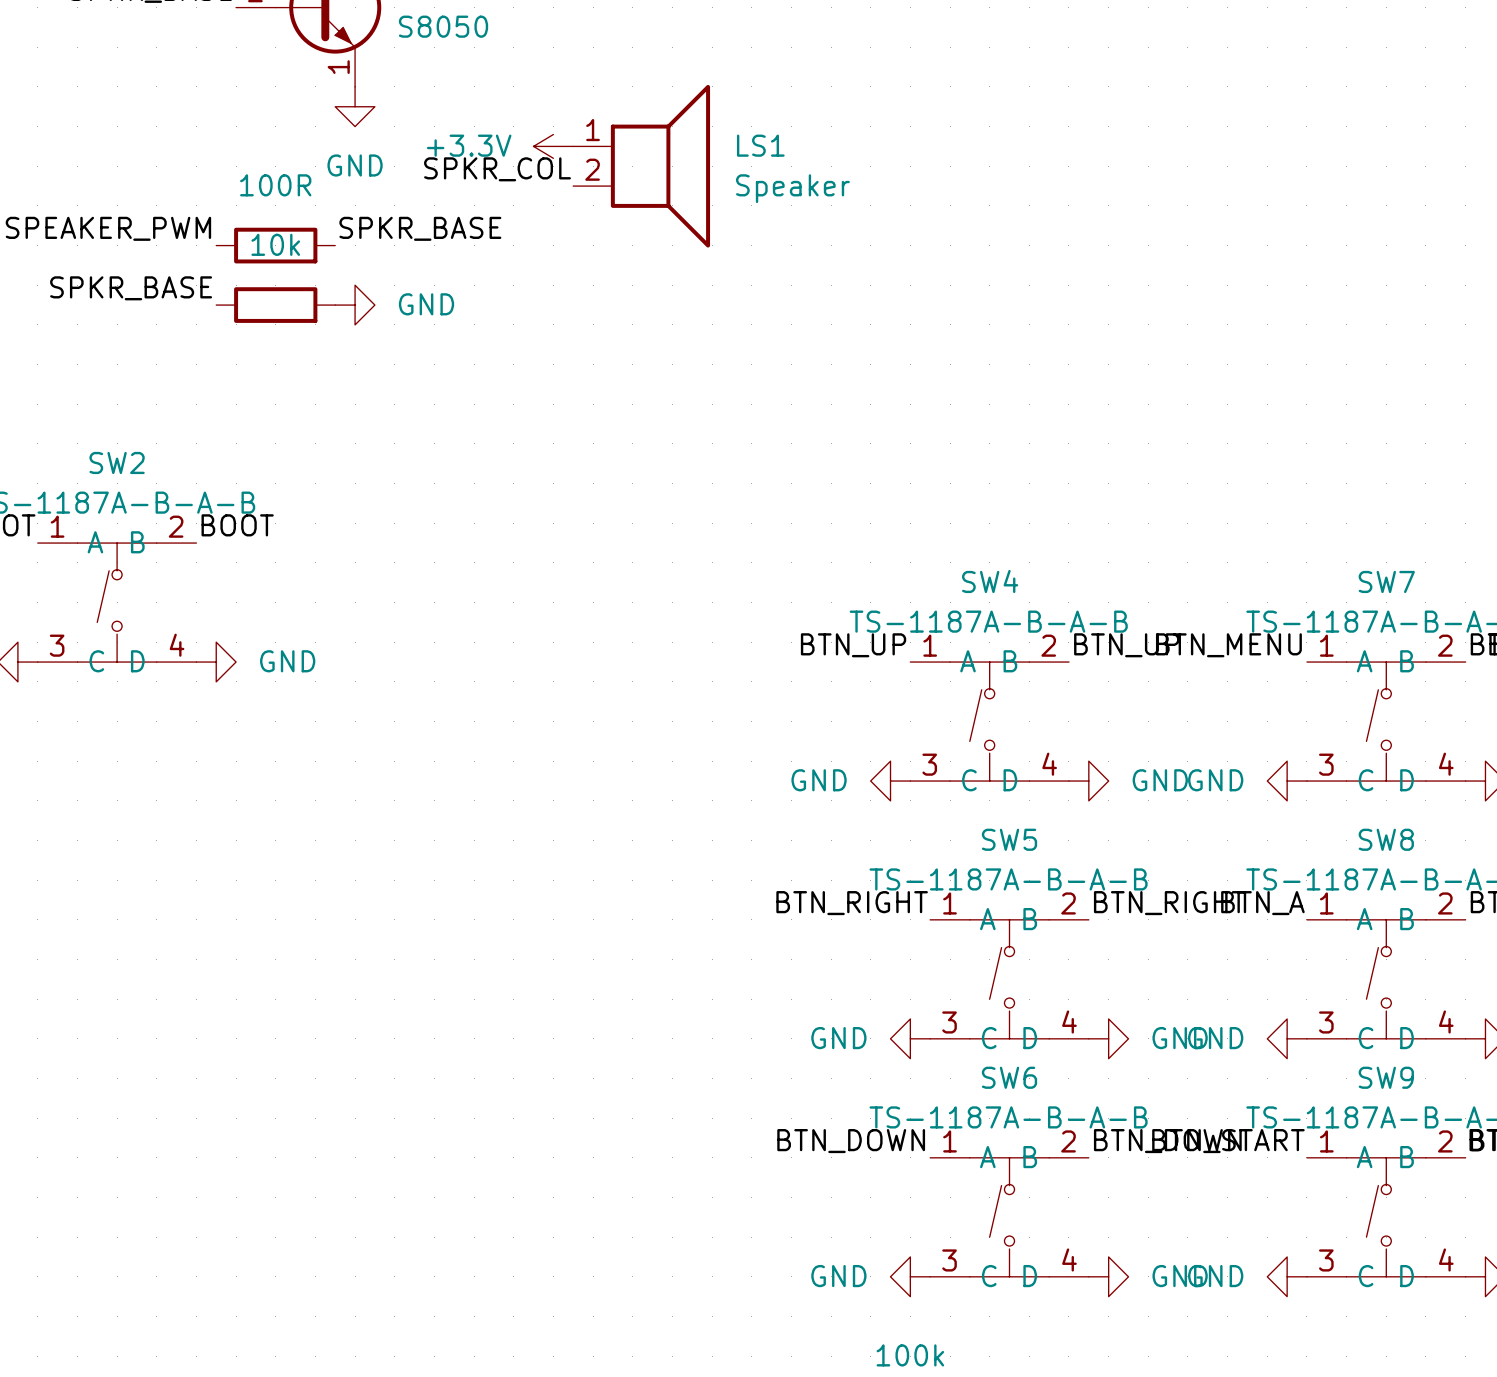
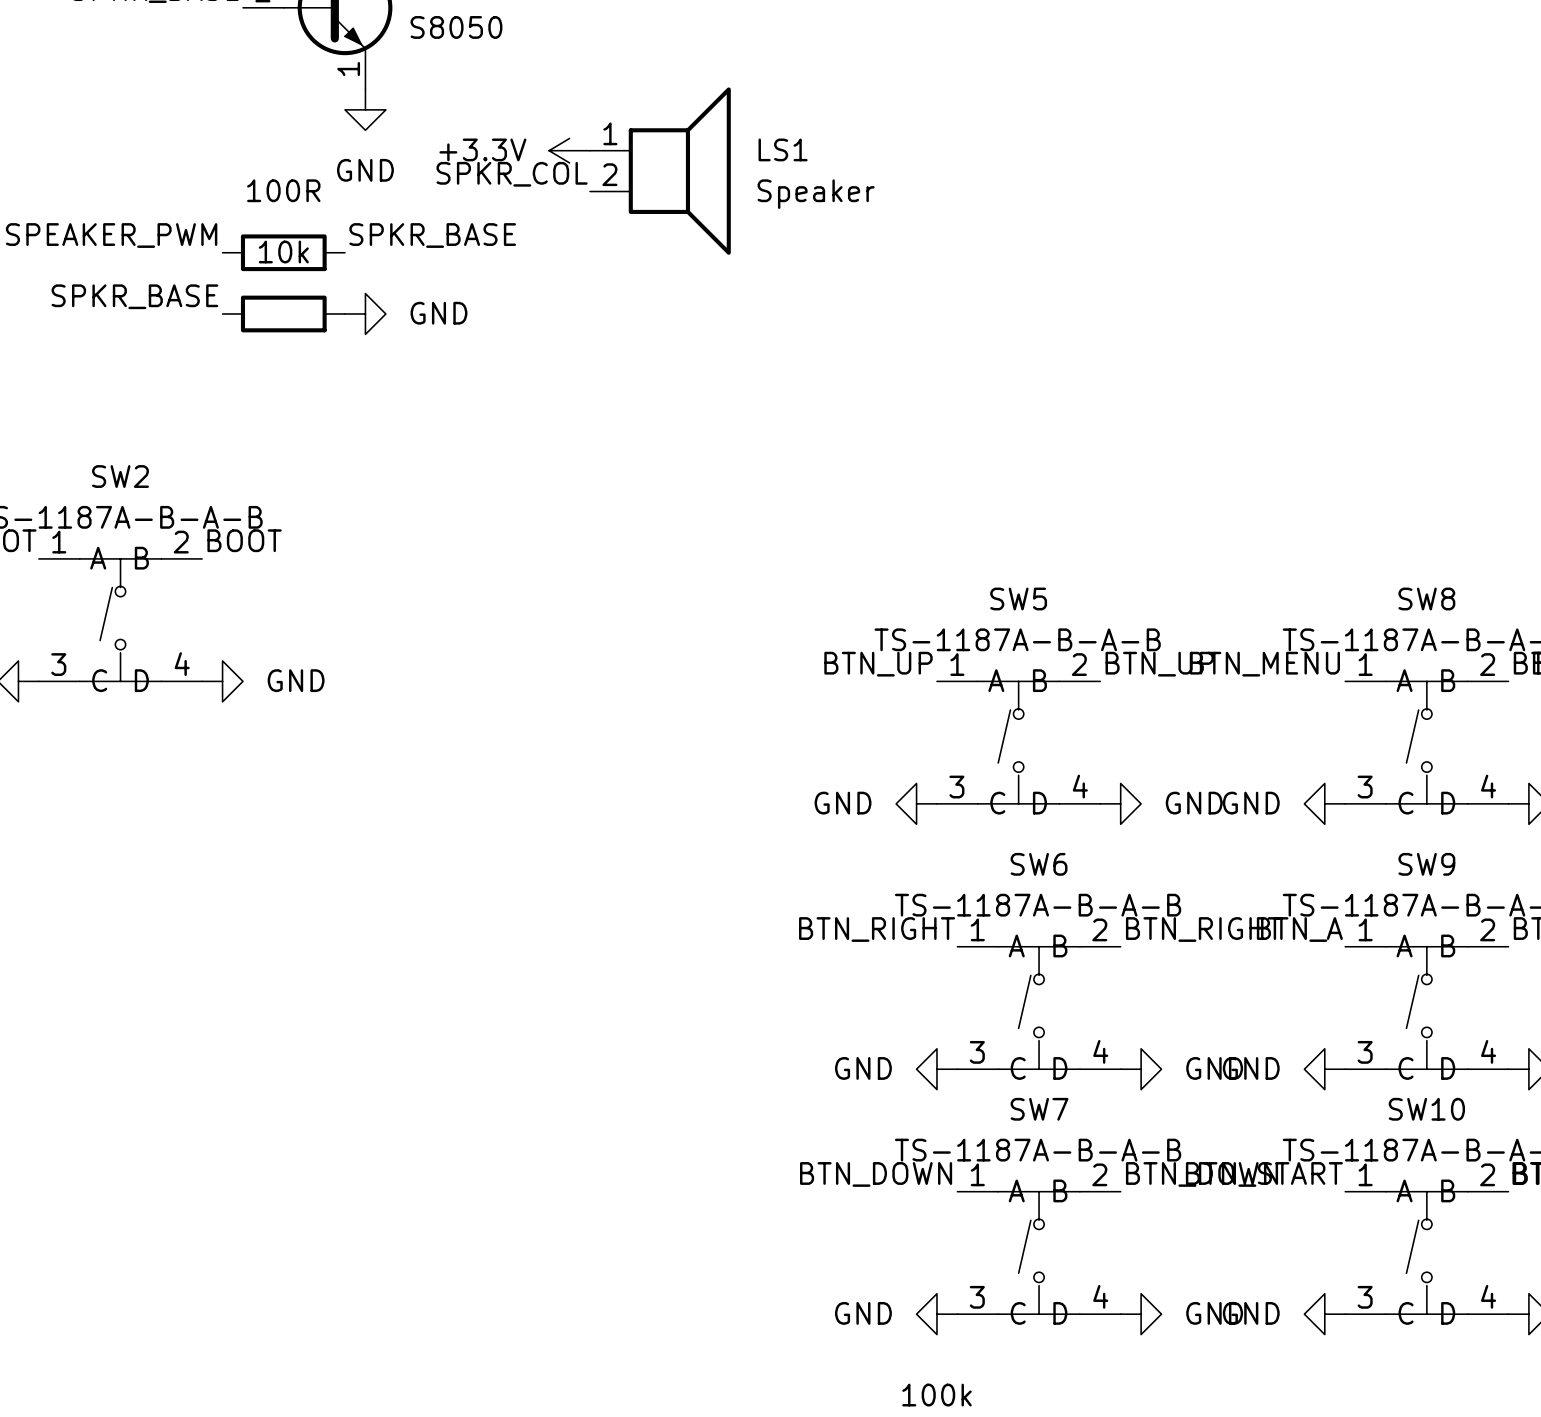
SW4 name: SW4 (990, 581) -> SW5 (1018, 598)
SW7 name: SW7 (1386, 581) -> SW8 (1426, 598)
SW5 name: SW5 (1009, 839) -> SW6 (1039, 864)
SW8 name: SW8 (1386, 839) -> SW9 (1426, 864)
SW6 name: SW6 (1009, 1077) -> SW7 (1039, 1109)
SW9 name: SW9 (1386, 1077) -> SW10 (1426, 1109)

